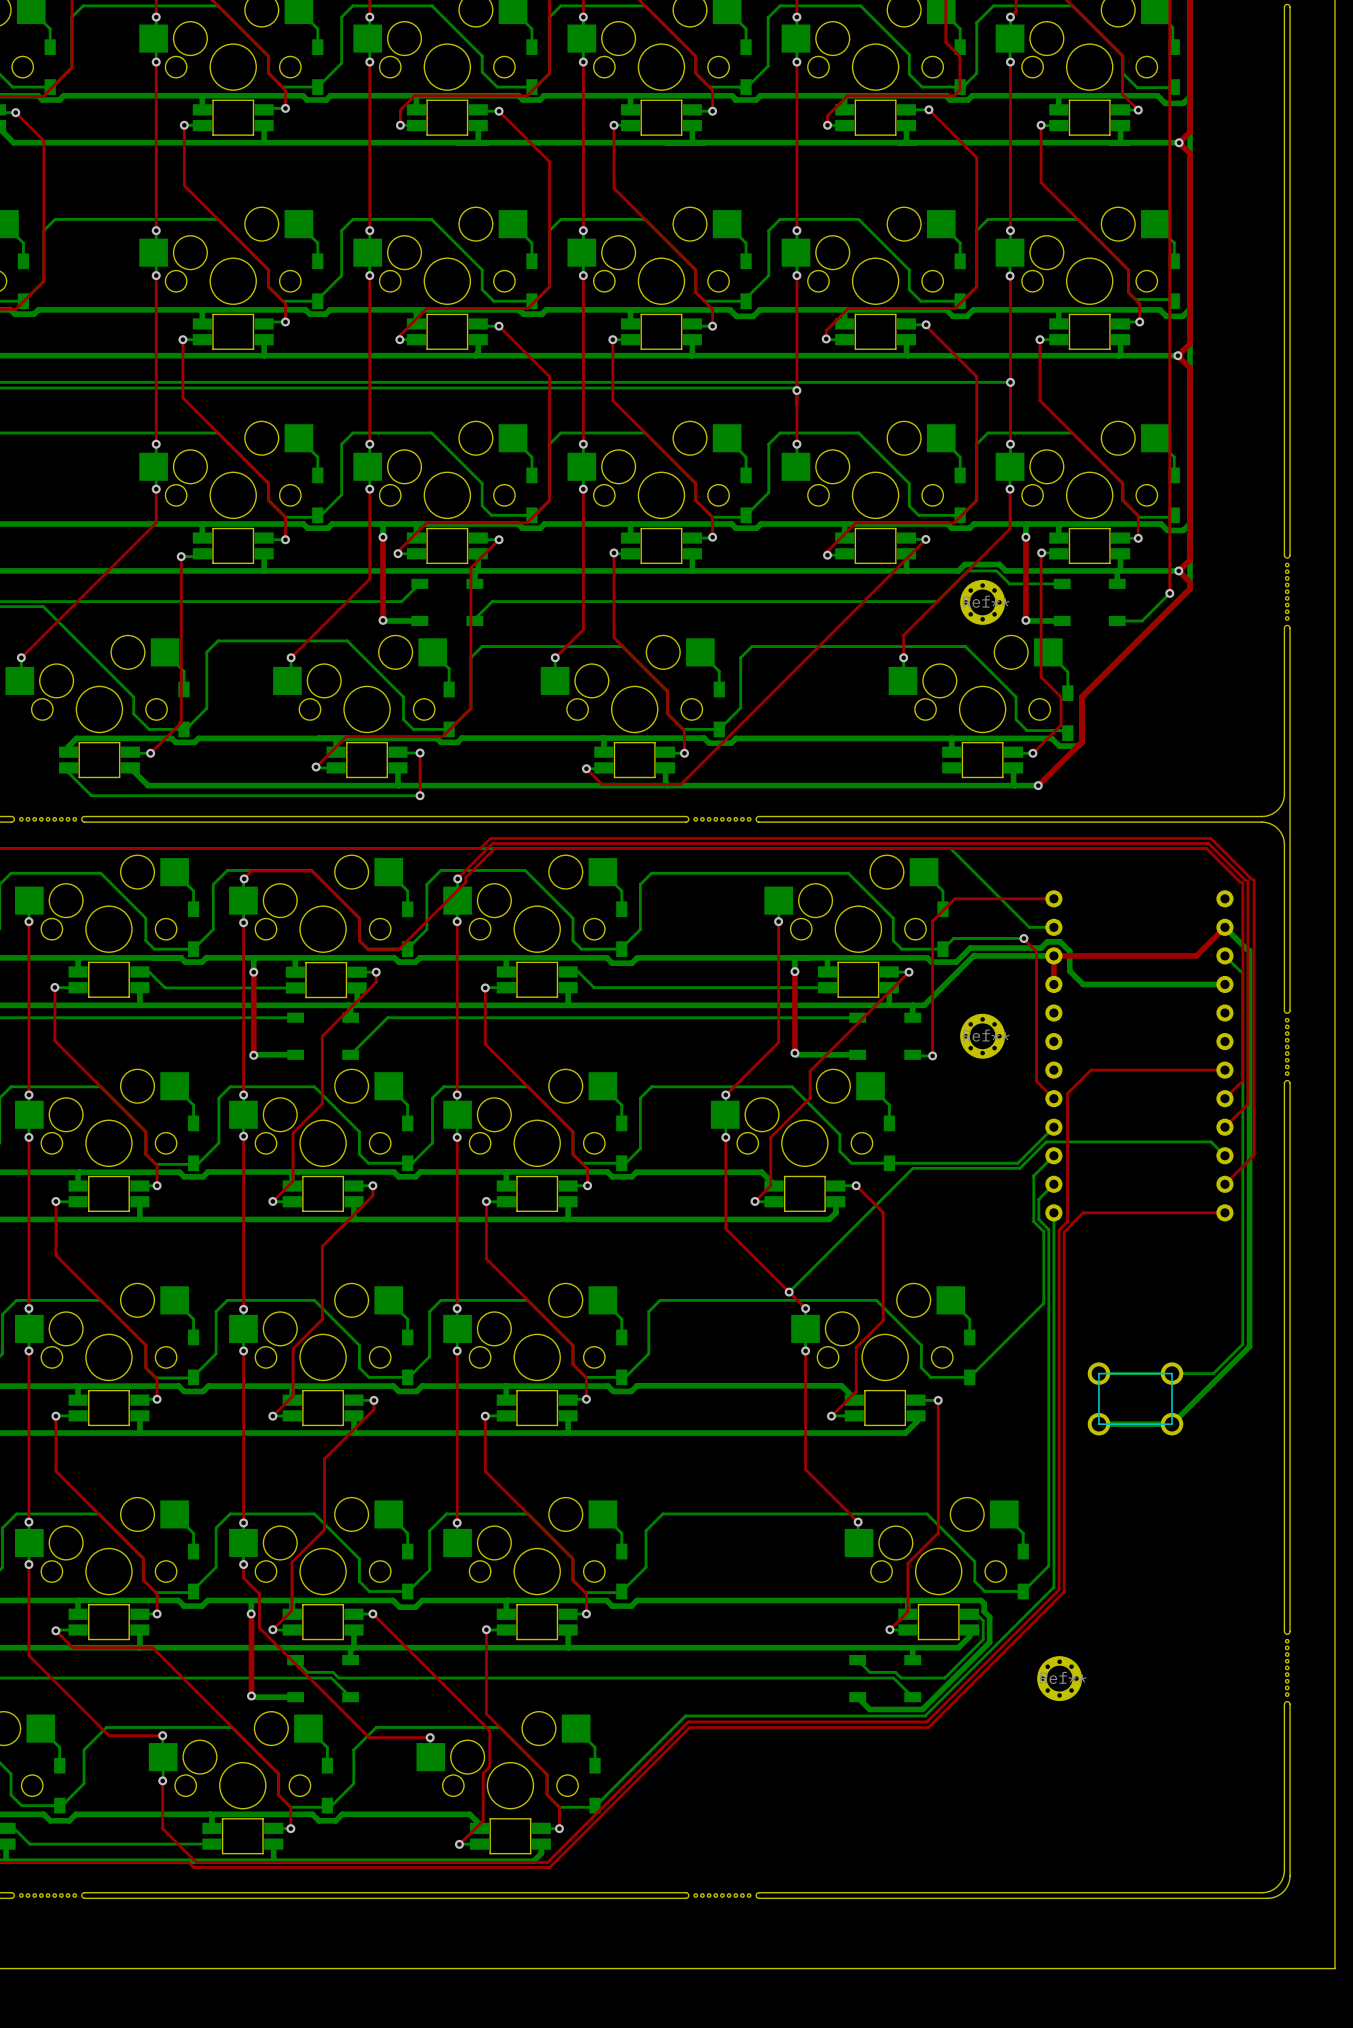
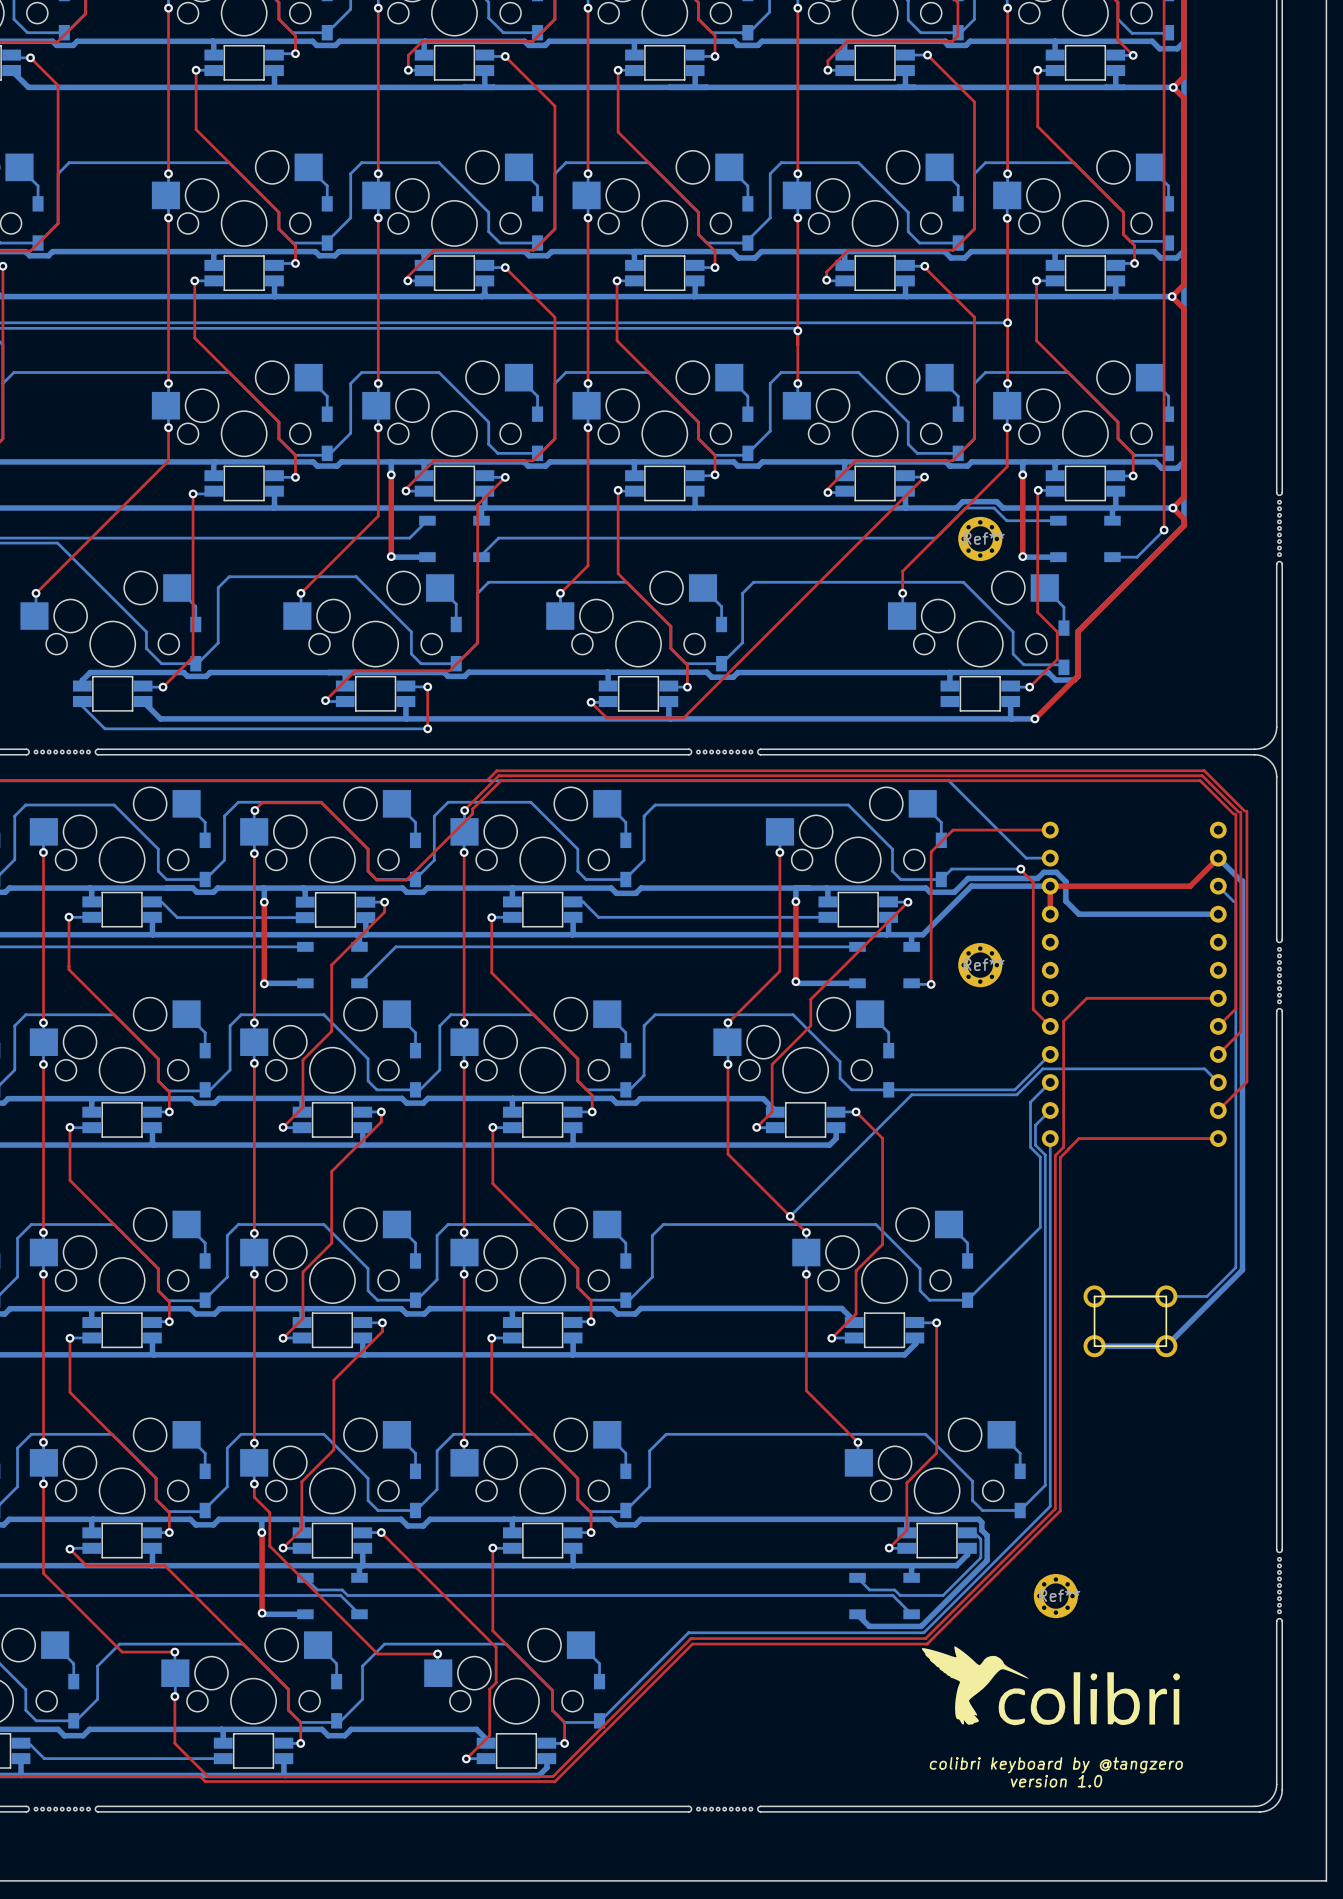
drawing: none -> [921, 1646, 1180, 1726]
text: none -> colibri keyboard by @tangzero (1056, 1765)
text: none -> version 1.0 (1056, 1781)

